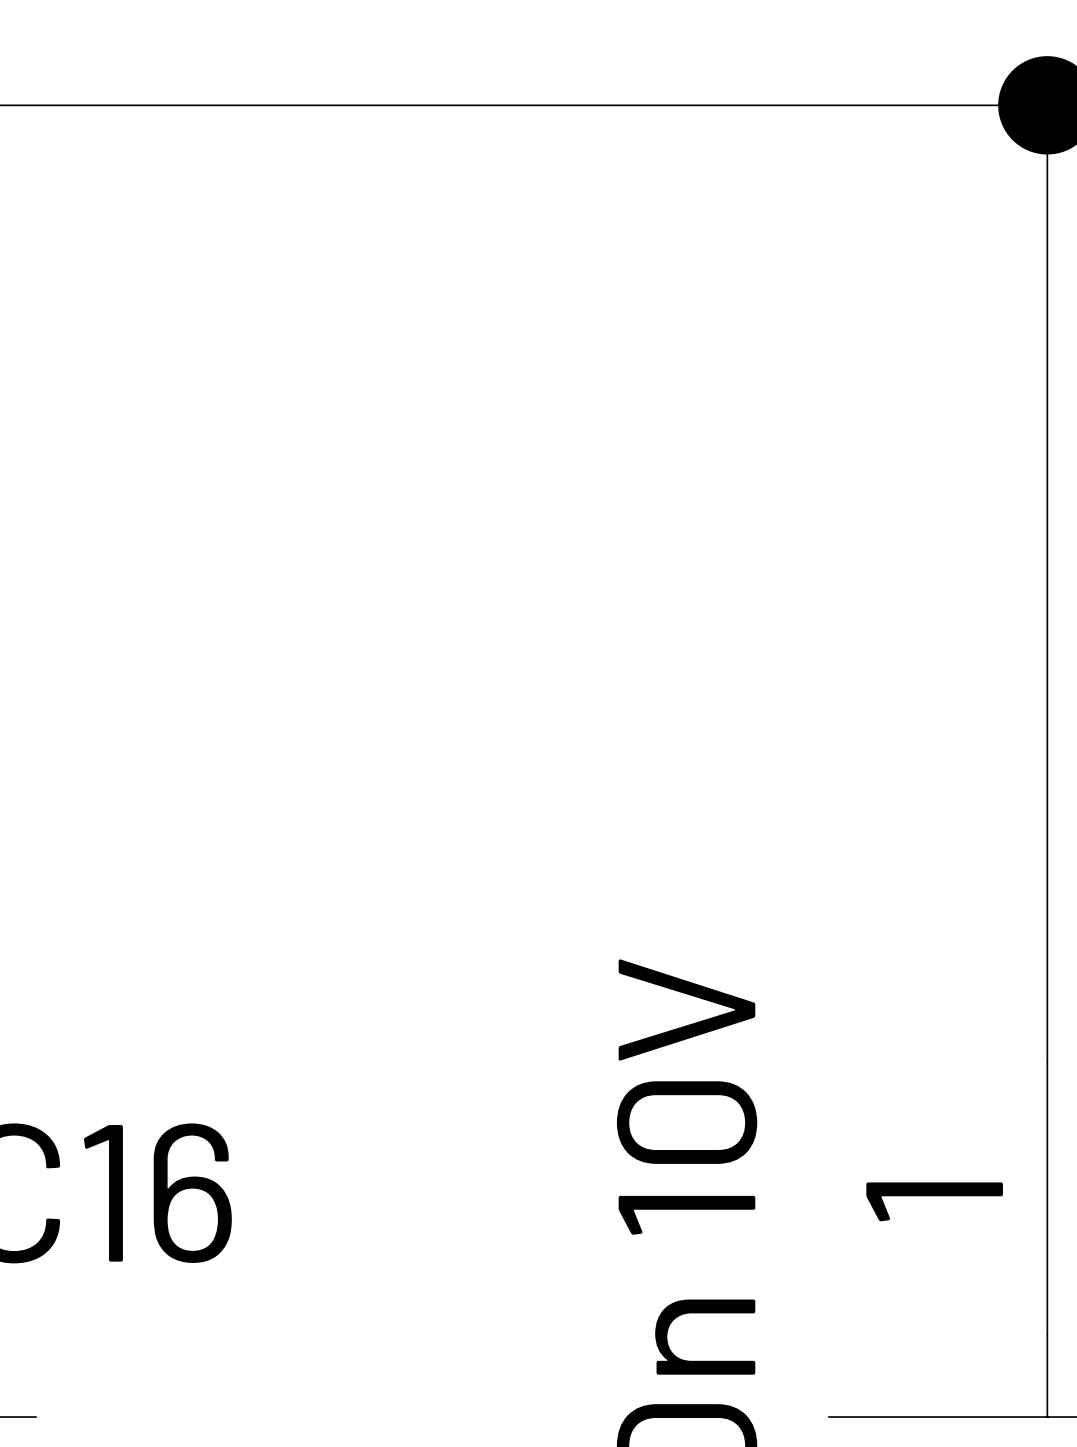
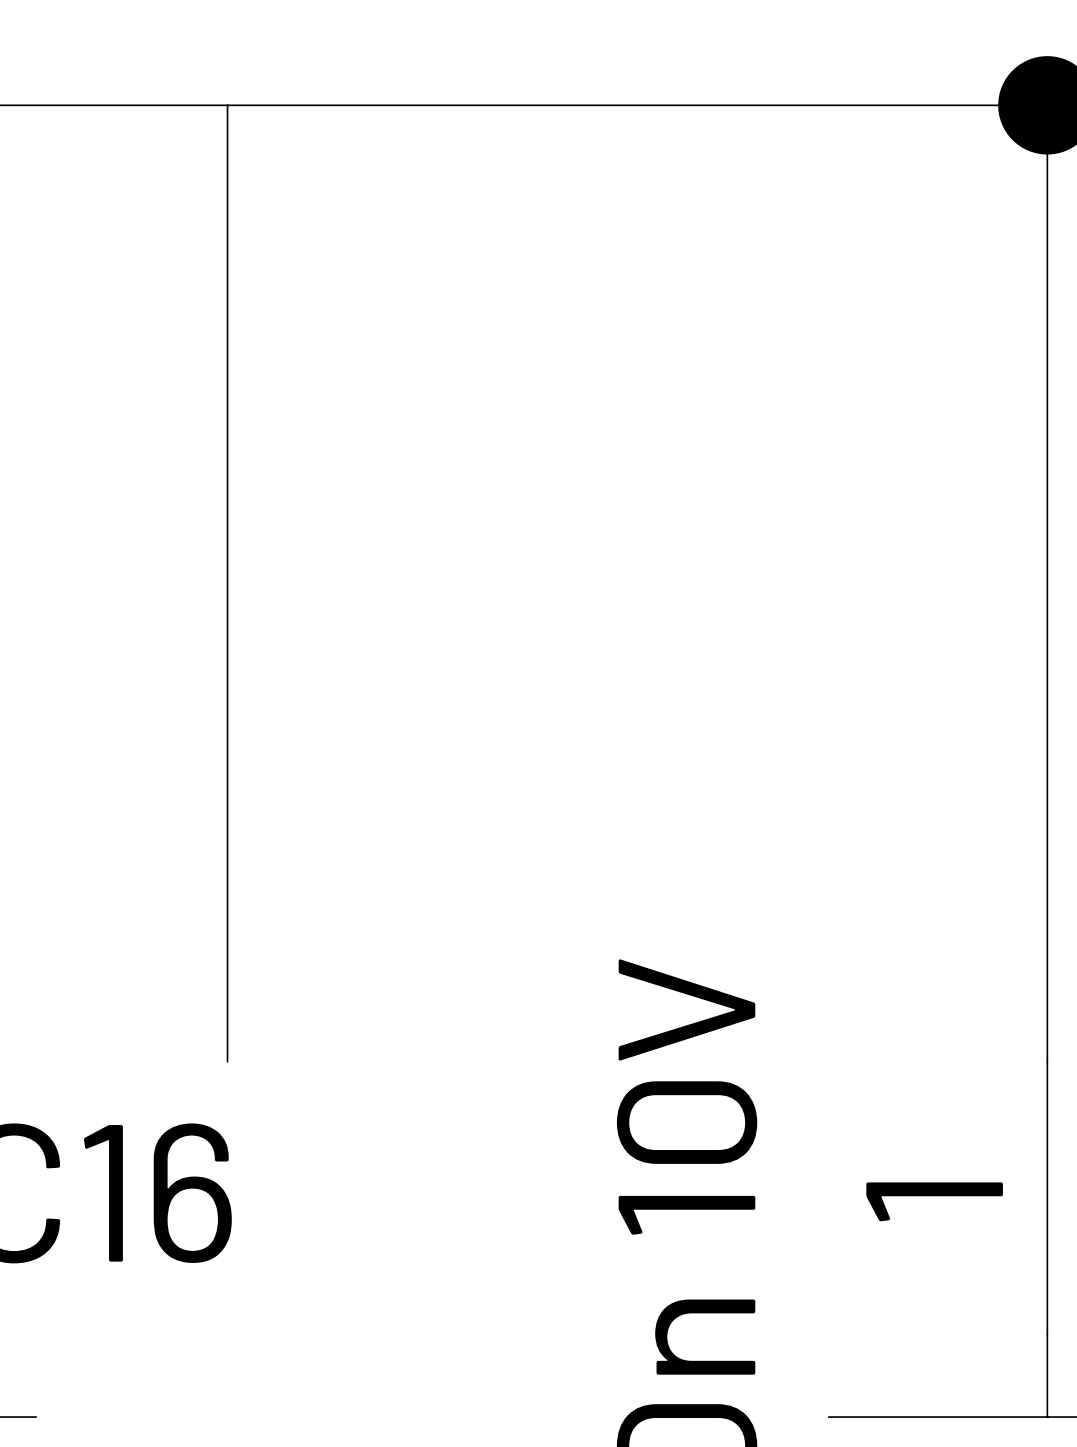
wire: none -> (227, 105) (227, 1061)

